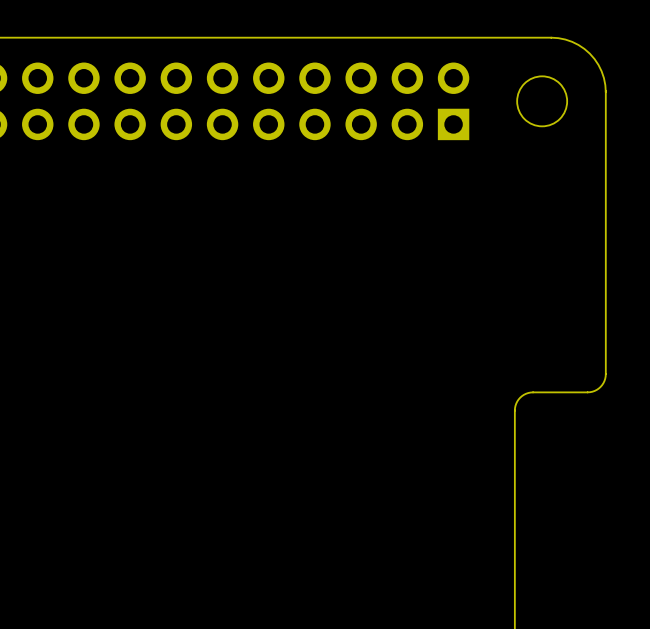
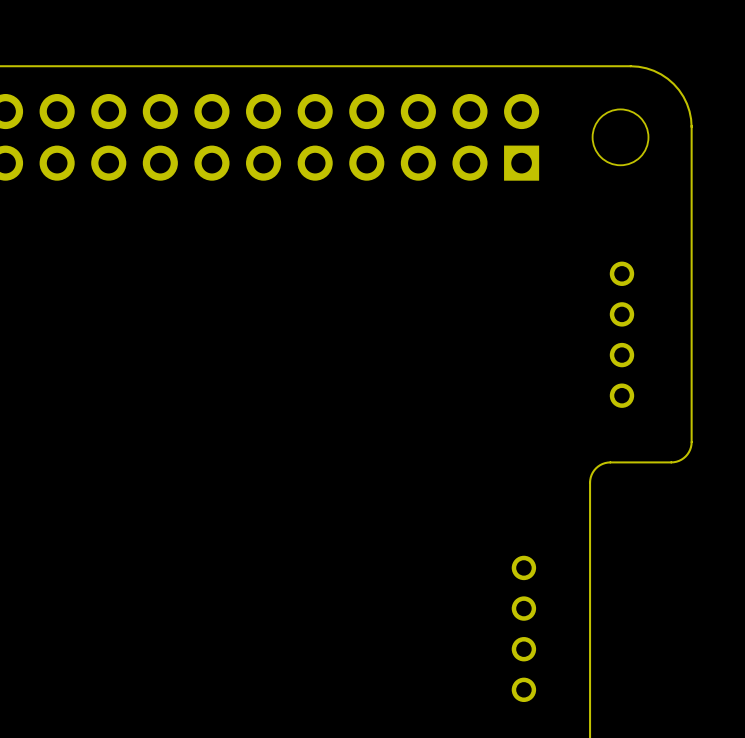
part: none -> (621, 334)
part: none -> (523, 628)

